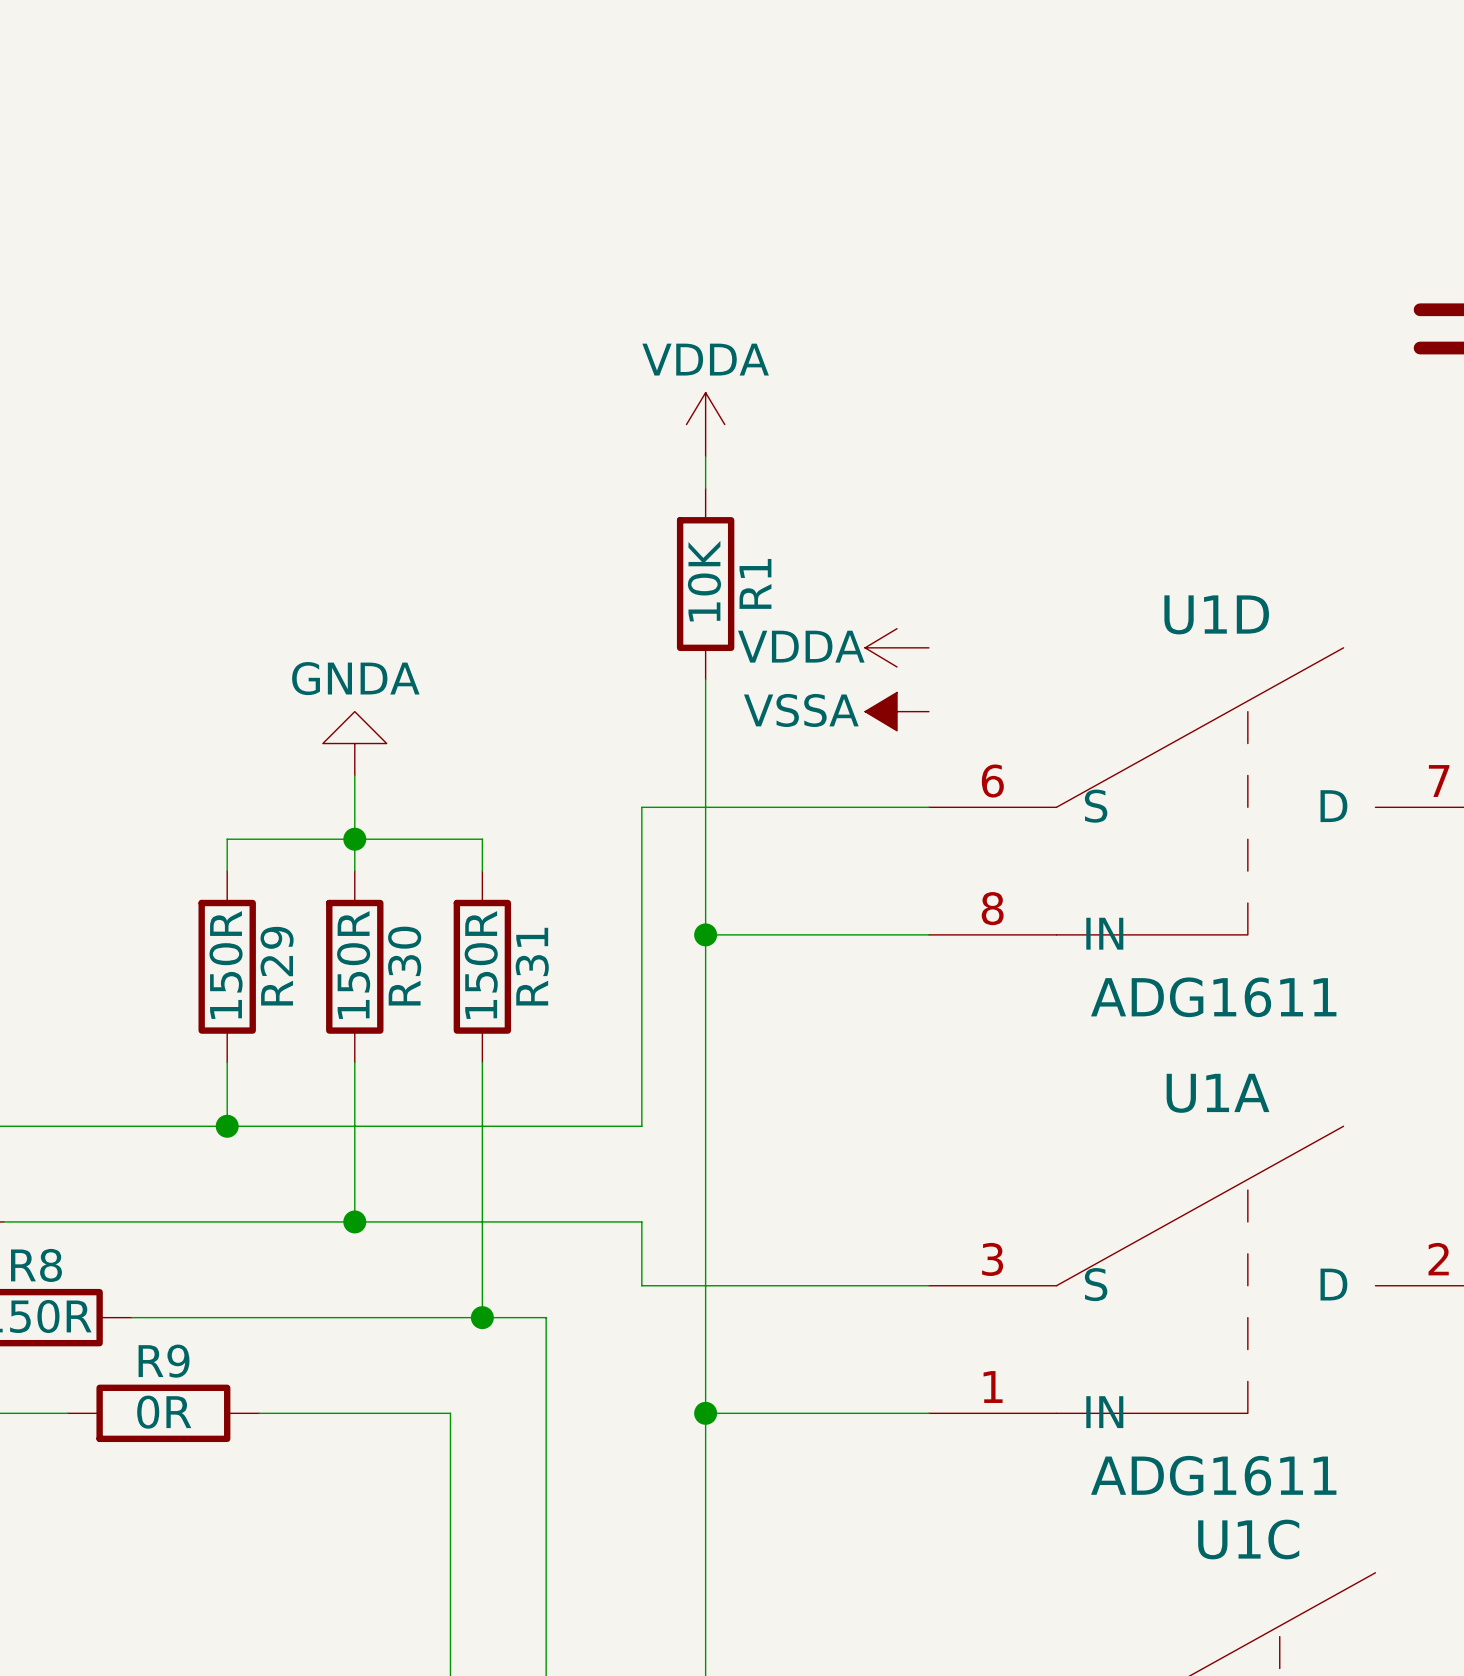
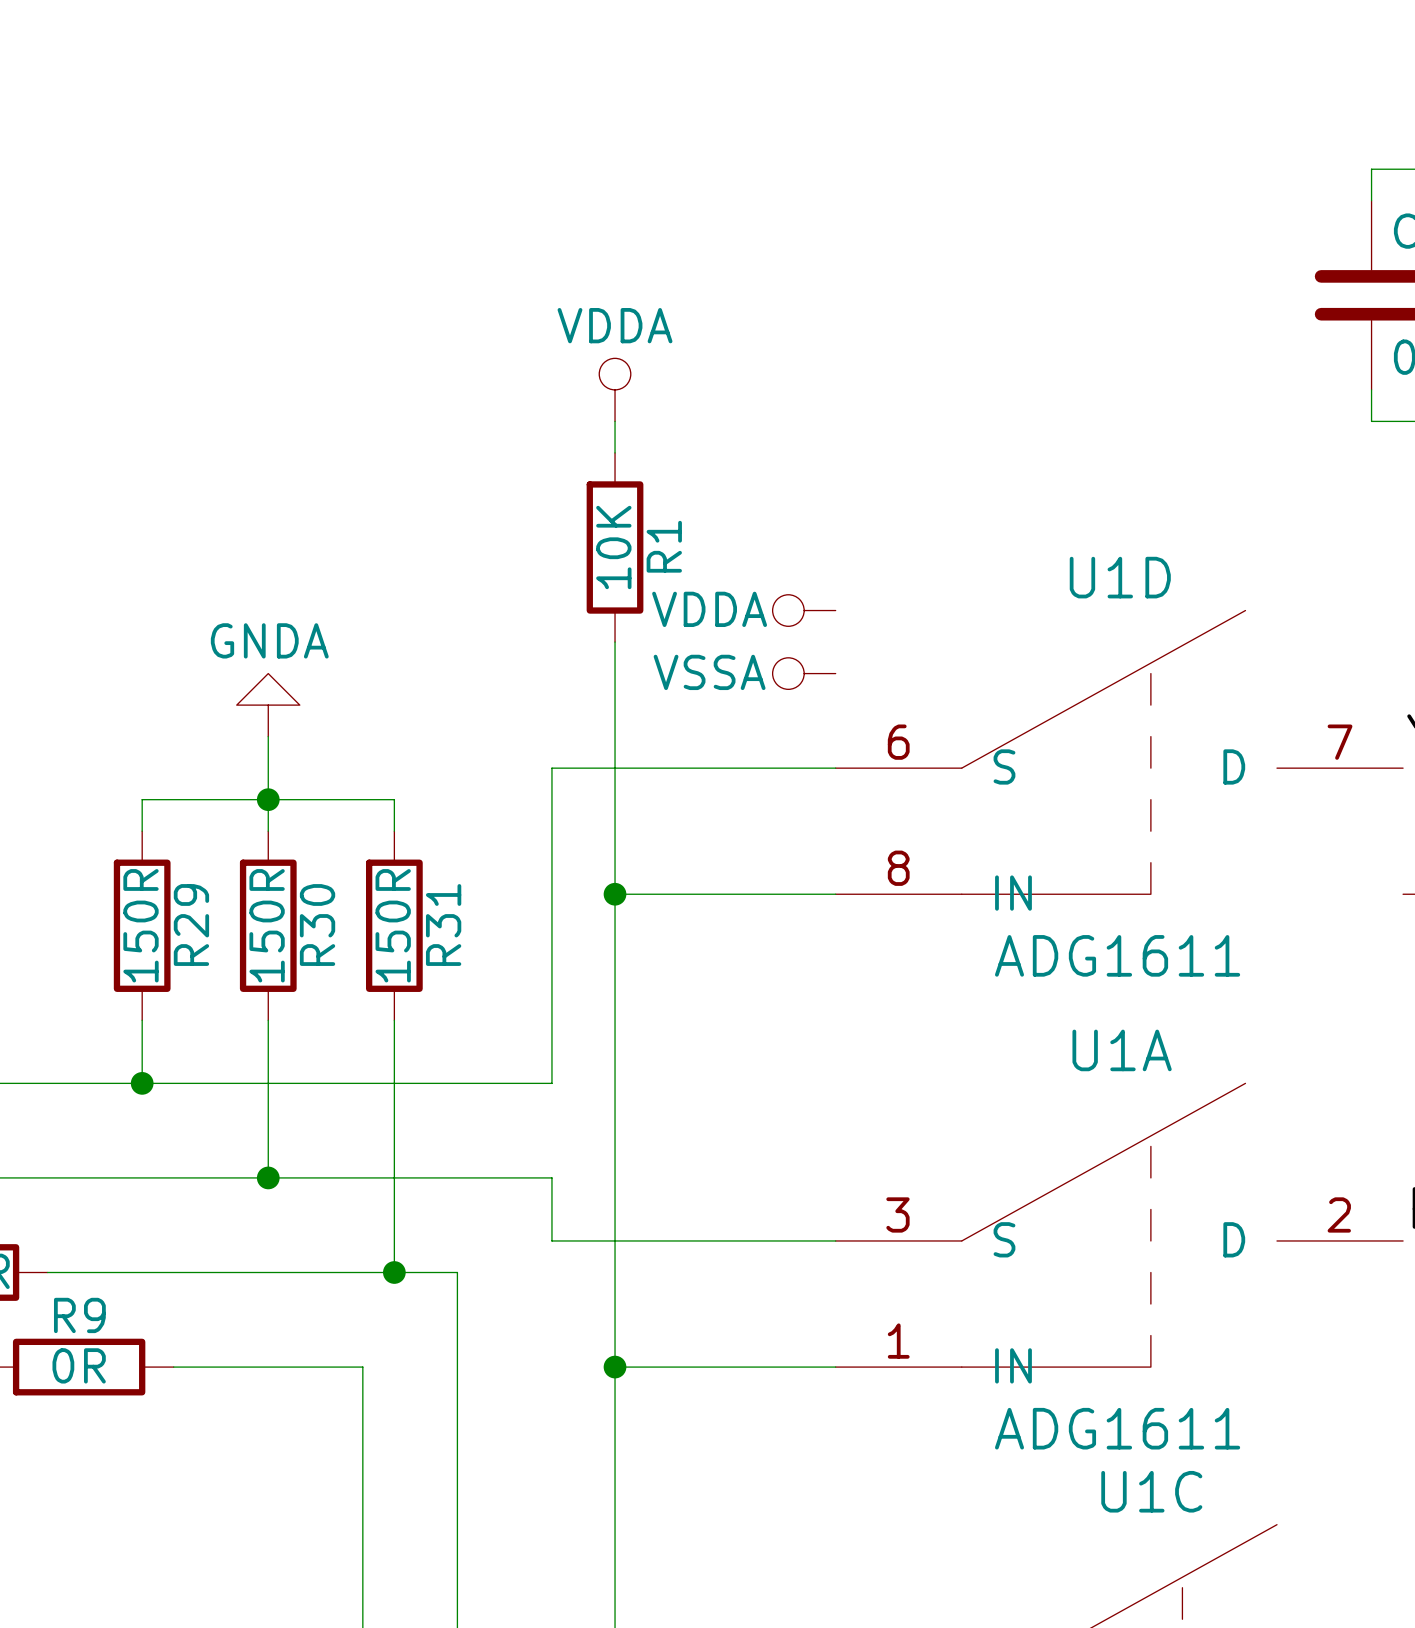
power symbol shape: [686, 392, 725, 457] -> [599, 358, 631, 422]
power symbol shape: [865, 628, 929, 667] -> [772, 594, 836, 627]
power symbol shape: [865, 692, 929, 731] -> [772, 657, 836, 690]

